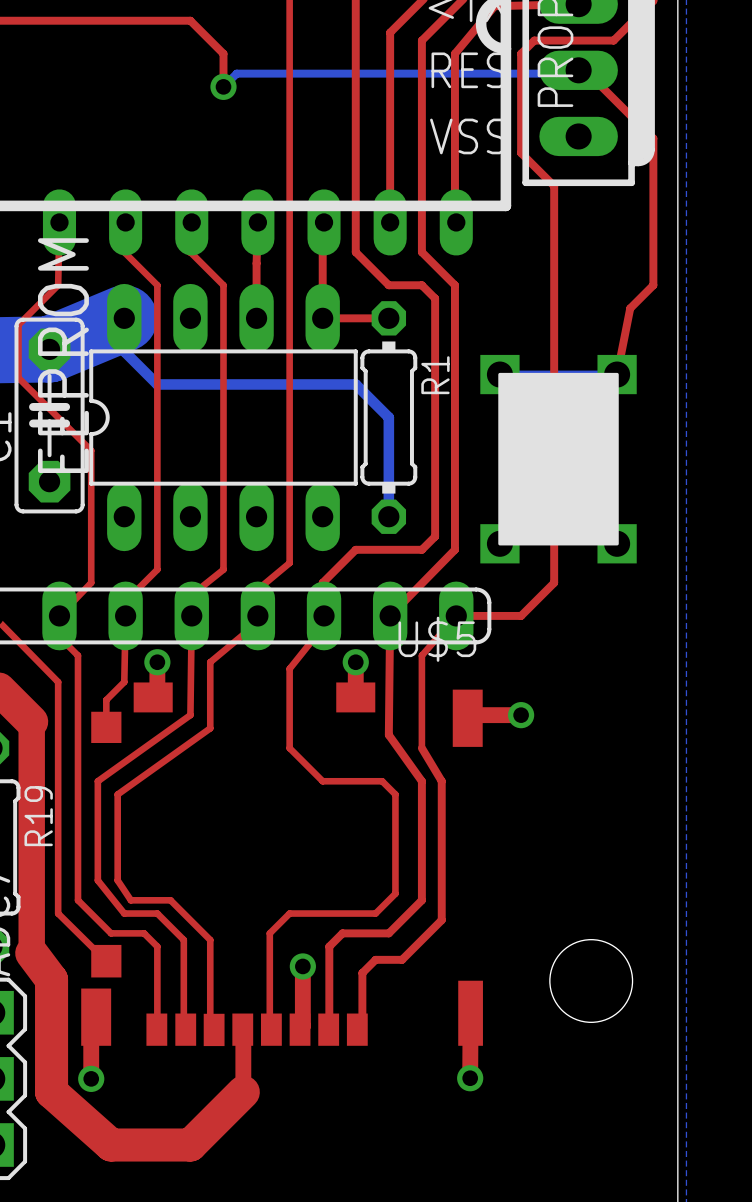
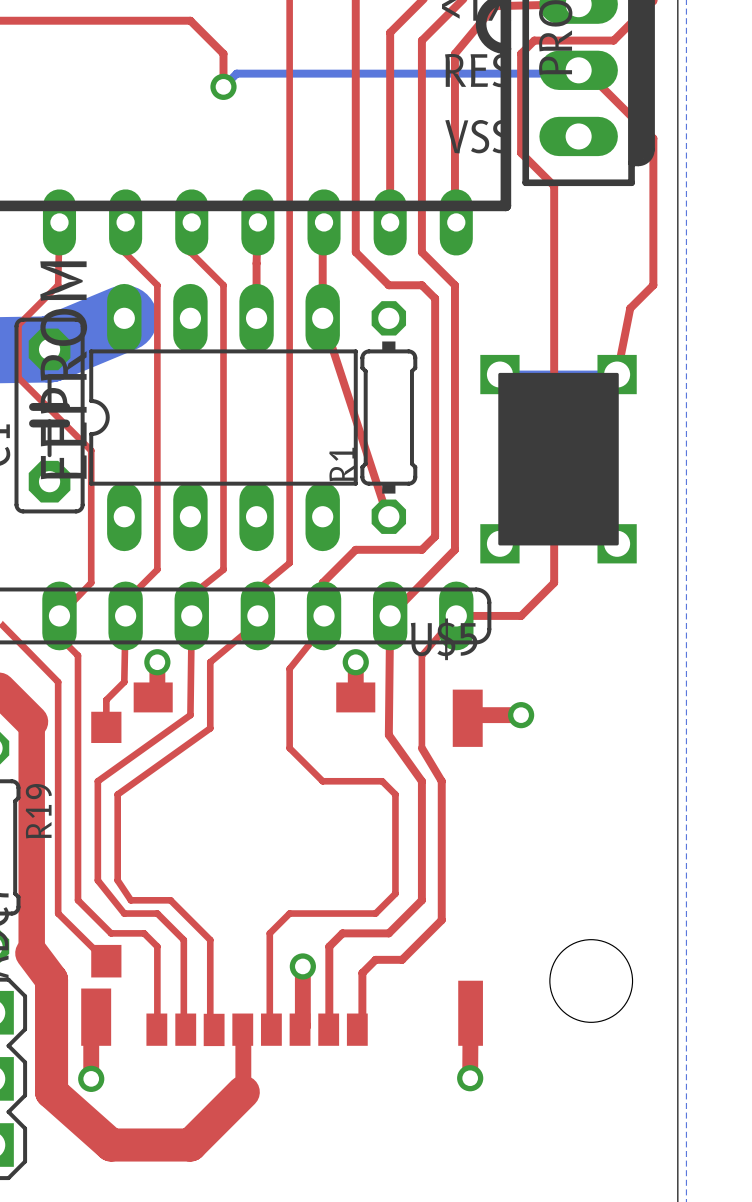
bottom track: (124, 318) (124, 351) (157, 384) (355, 384) (388, 417) (388, 516) -> none
top track: (322, 318) (388, 318) -> (322, 318) (386, 514)
R1 name position: R1 (435, 375) -> R1 (342, 464)

